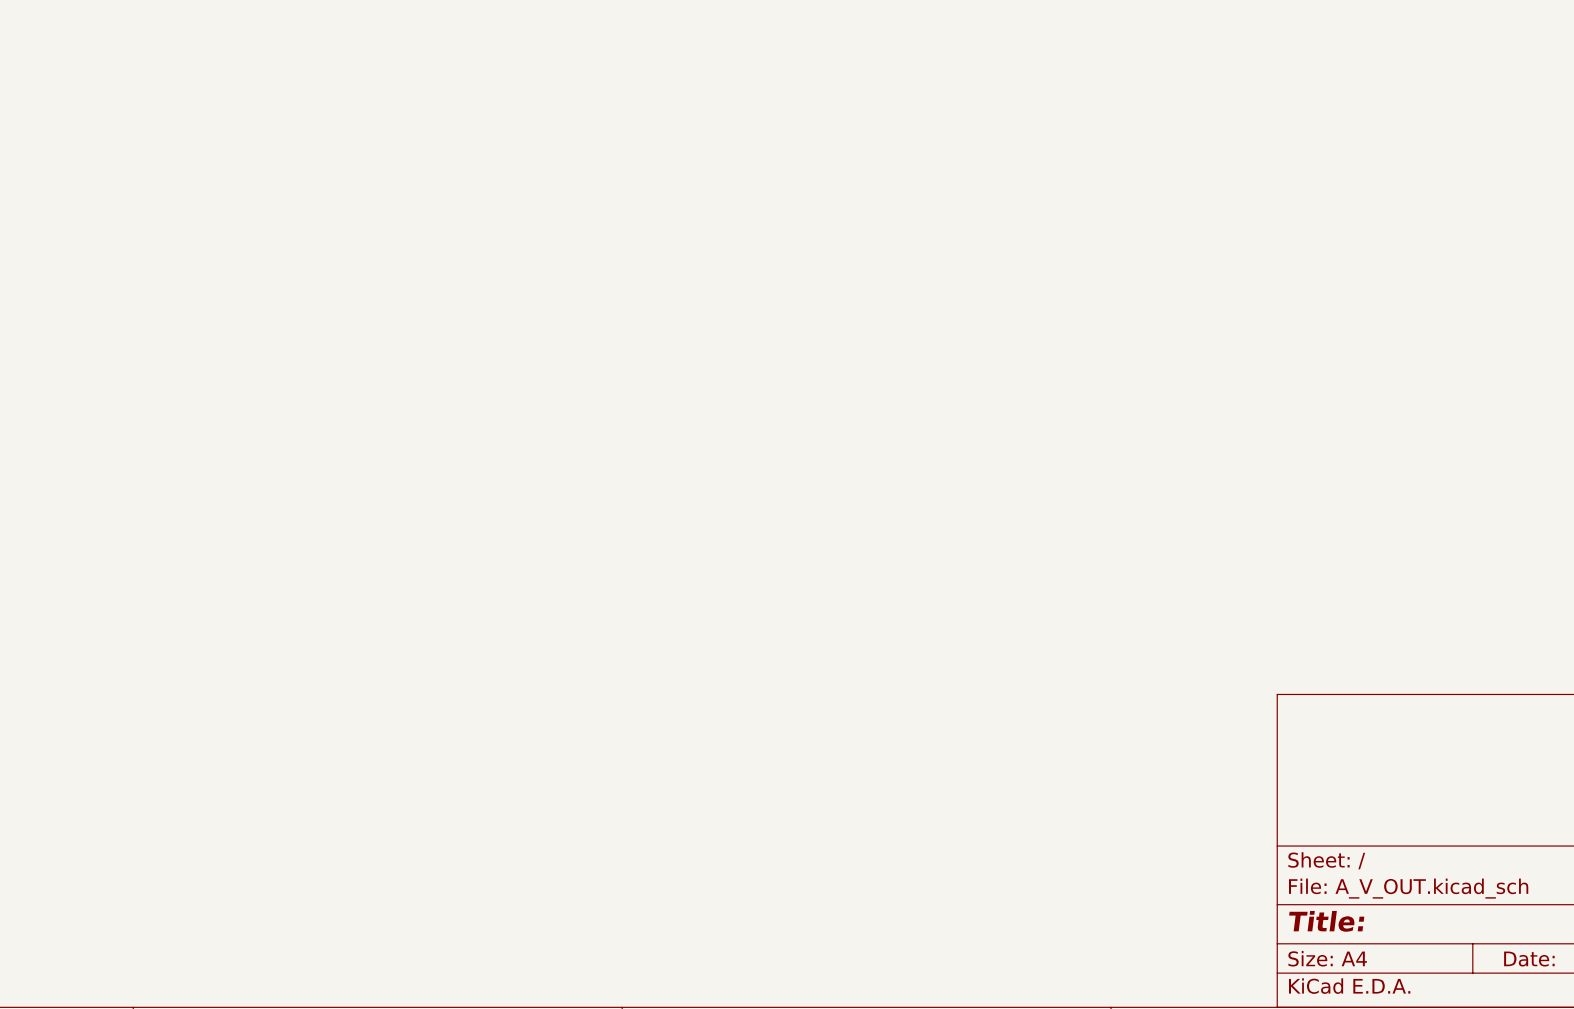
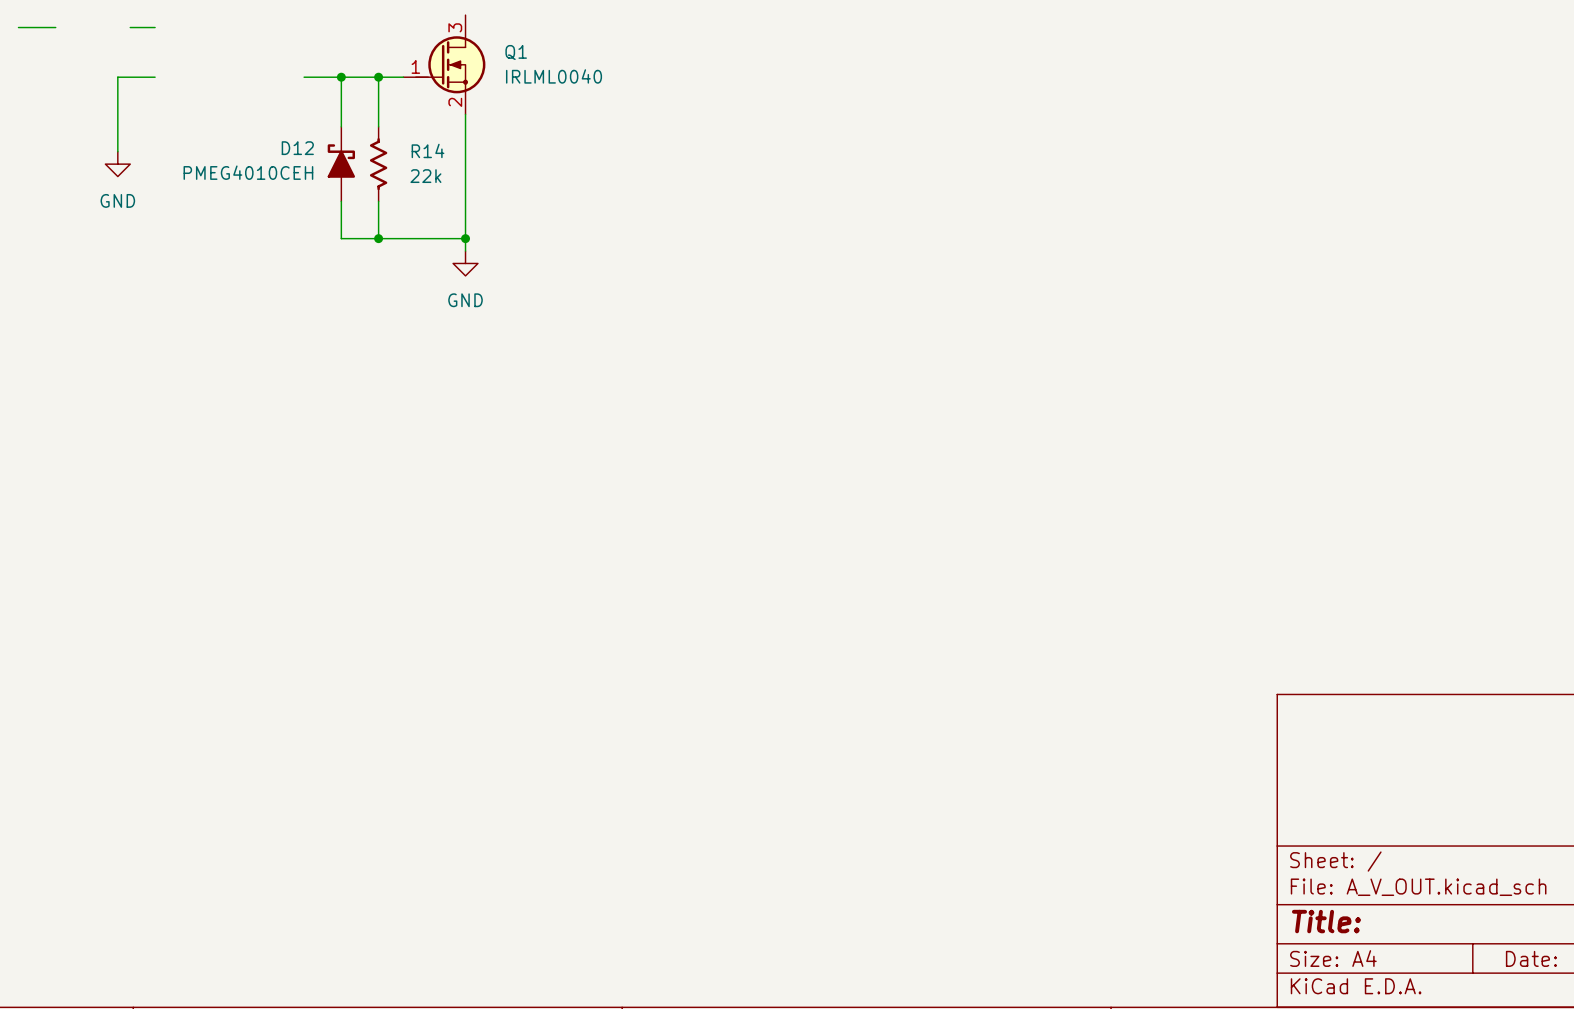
wire: none -> (18, 27) (55, 27)
wire: none -> (130, 27) (155, 27)
Q1: none -> IRLML0040 (444, 64)
wire: none -> (155, 77) (117, 77) (117, 151)
wire: none -> (304, 77) (403, 77)
wire: none -> (341, 77) (341, 126)
junction: none -> (341, 77)
wire: none -> (378, 77) (378, 126)
junction: none -> (378, 77)
wire: none -> (465, 114) (465, 251)
power symbol: none -> GND (117, 164)
D12: none -> PMEG4010CEH (341, 164)
R14: none -> 22k (378, 164)
wire: none -> (341, 201) (341, 238) (465, 238)
wire: none -> (378, 201) (378, 238)
junction: none -> (378, 238)
junction: none -> (465, 238)
power symbol: none -> GND (465, 263)

